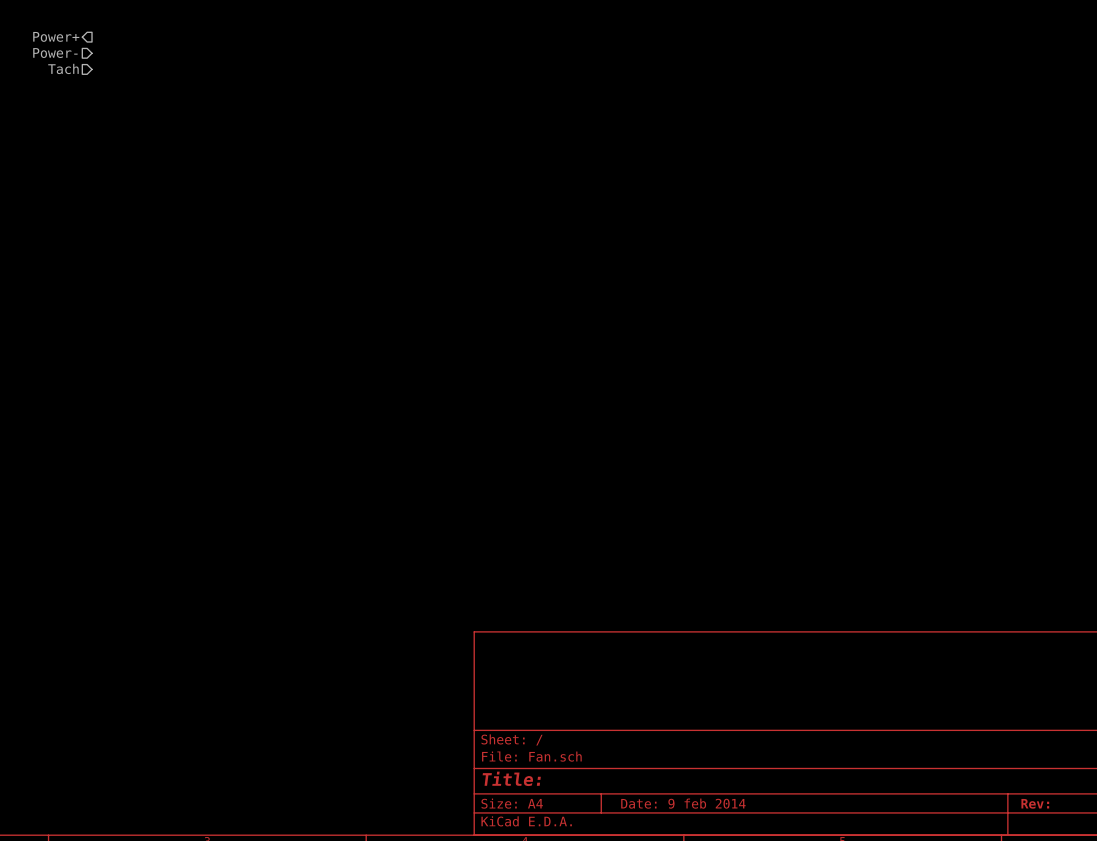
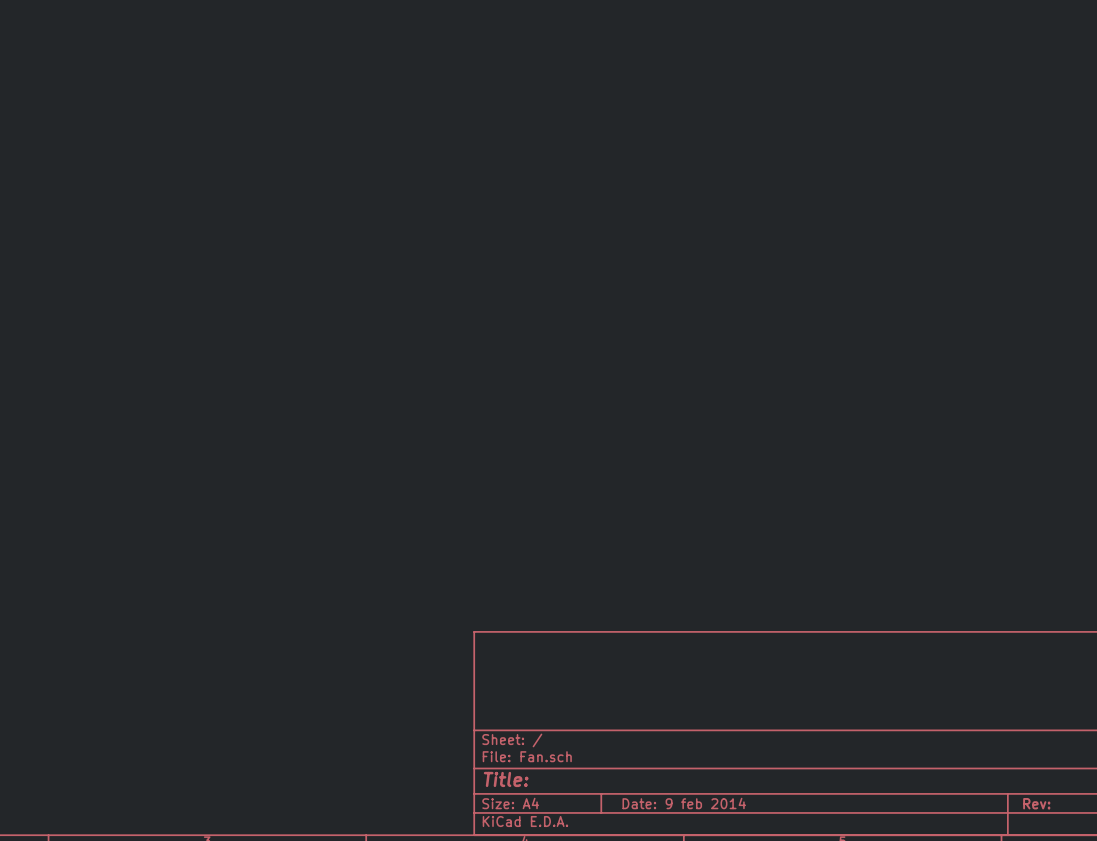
hierarchical label: Power+ (56, 36) -> none
hierarchical label: Power- (55, 53) -> none
hierarchical label: Tach (63, 68) -> none

